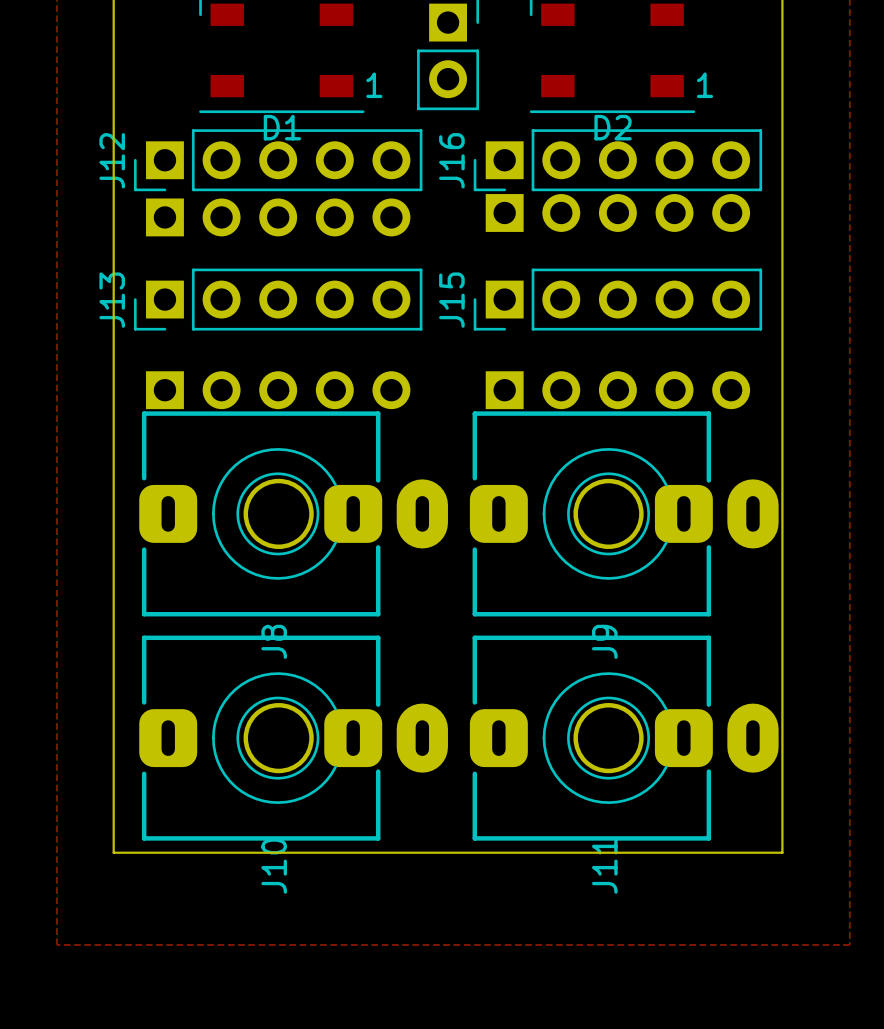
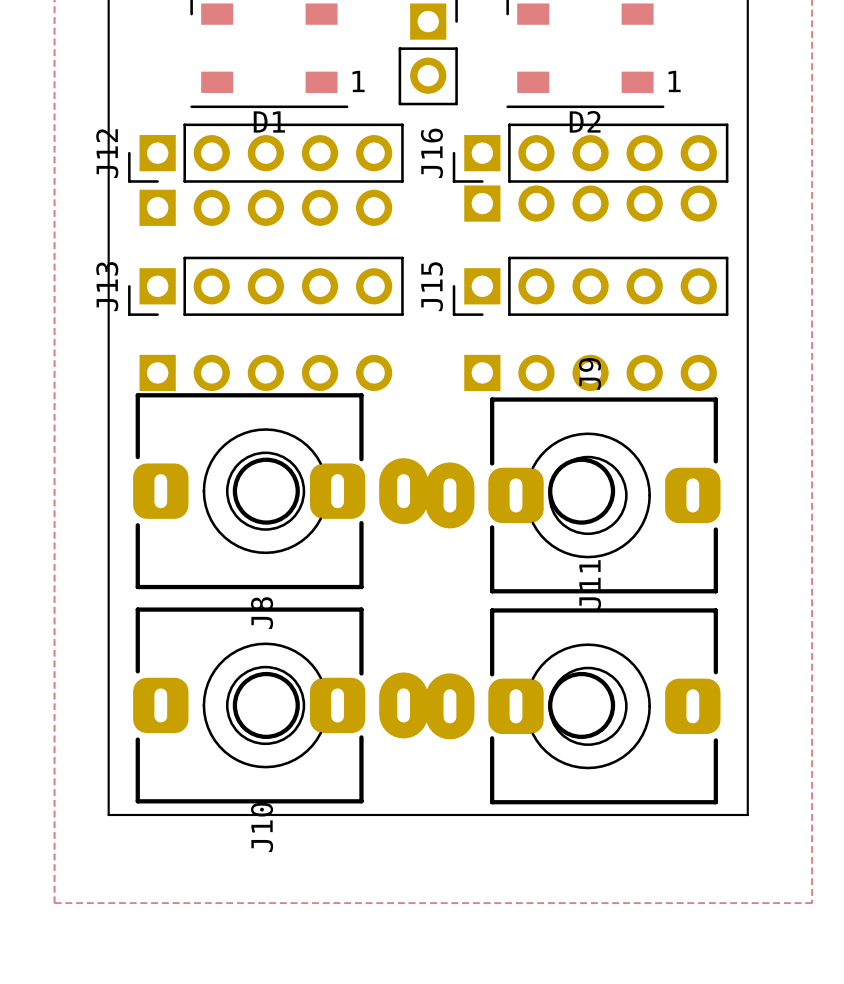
J9 rotation: 0° (624, 513) -> 180° (572, 495)
J11 rotation: 0° (624, 738) -> 180° (572, 706)

